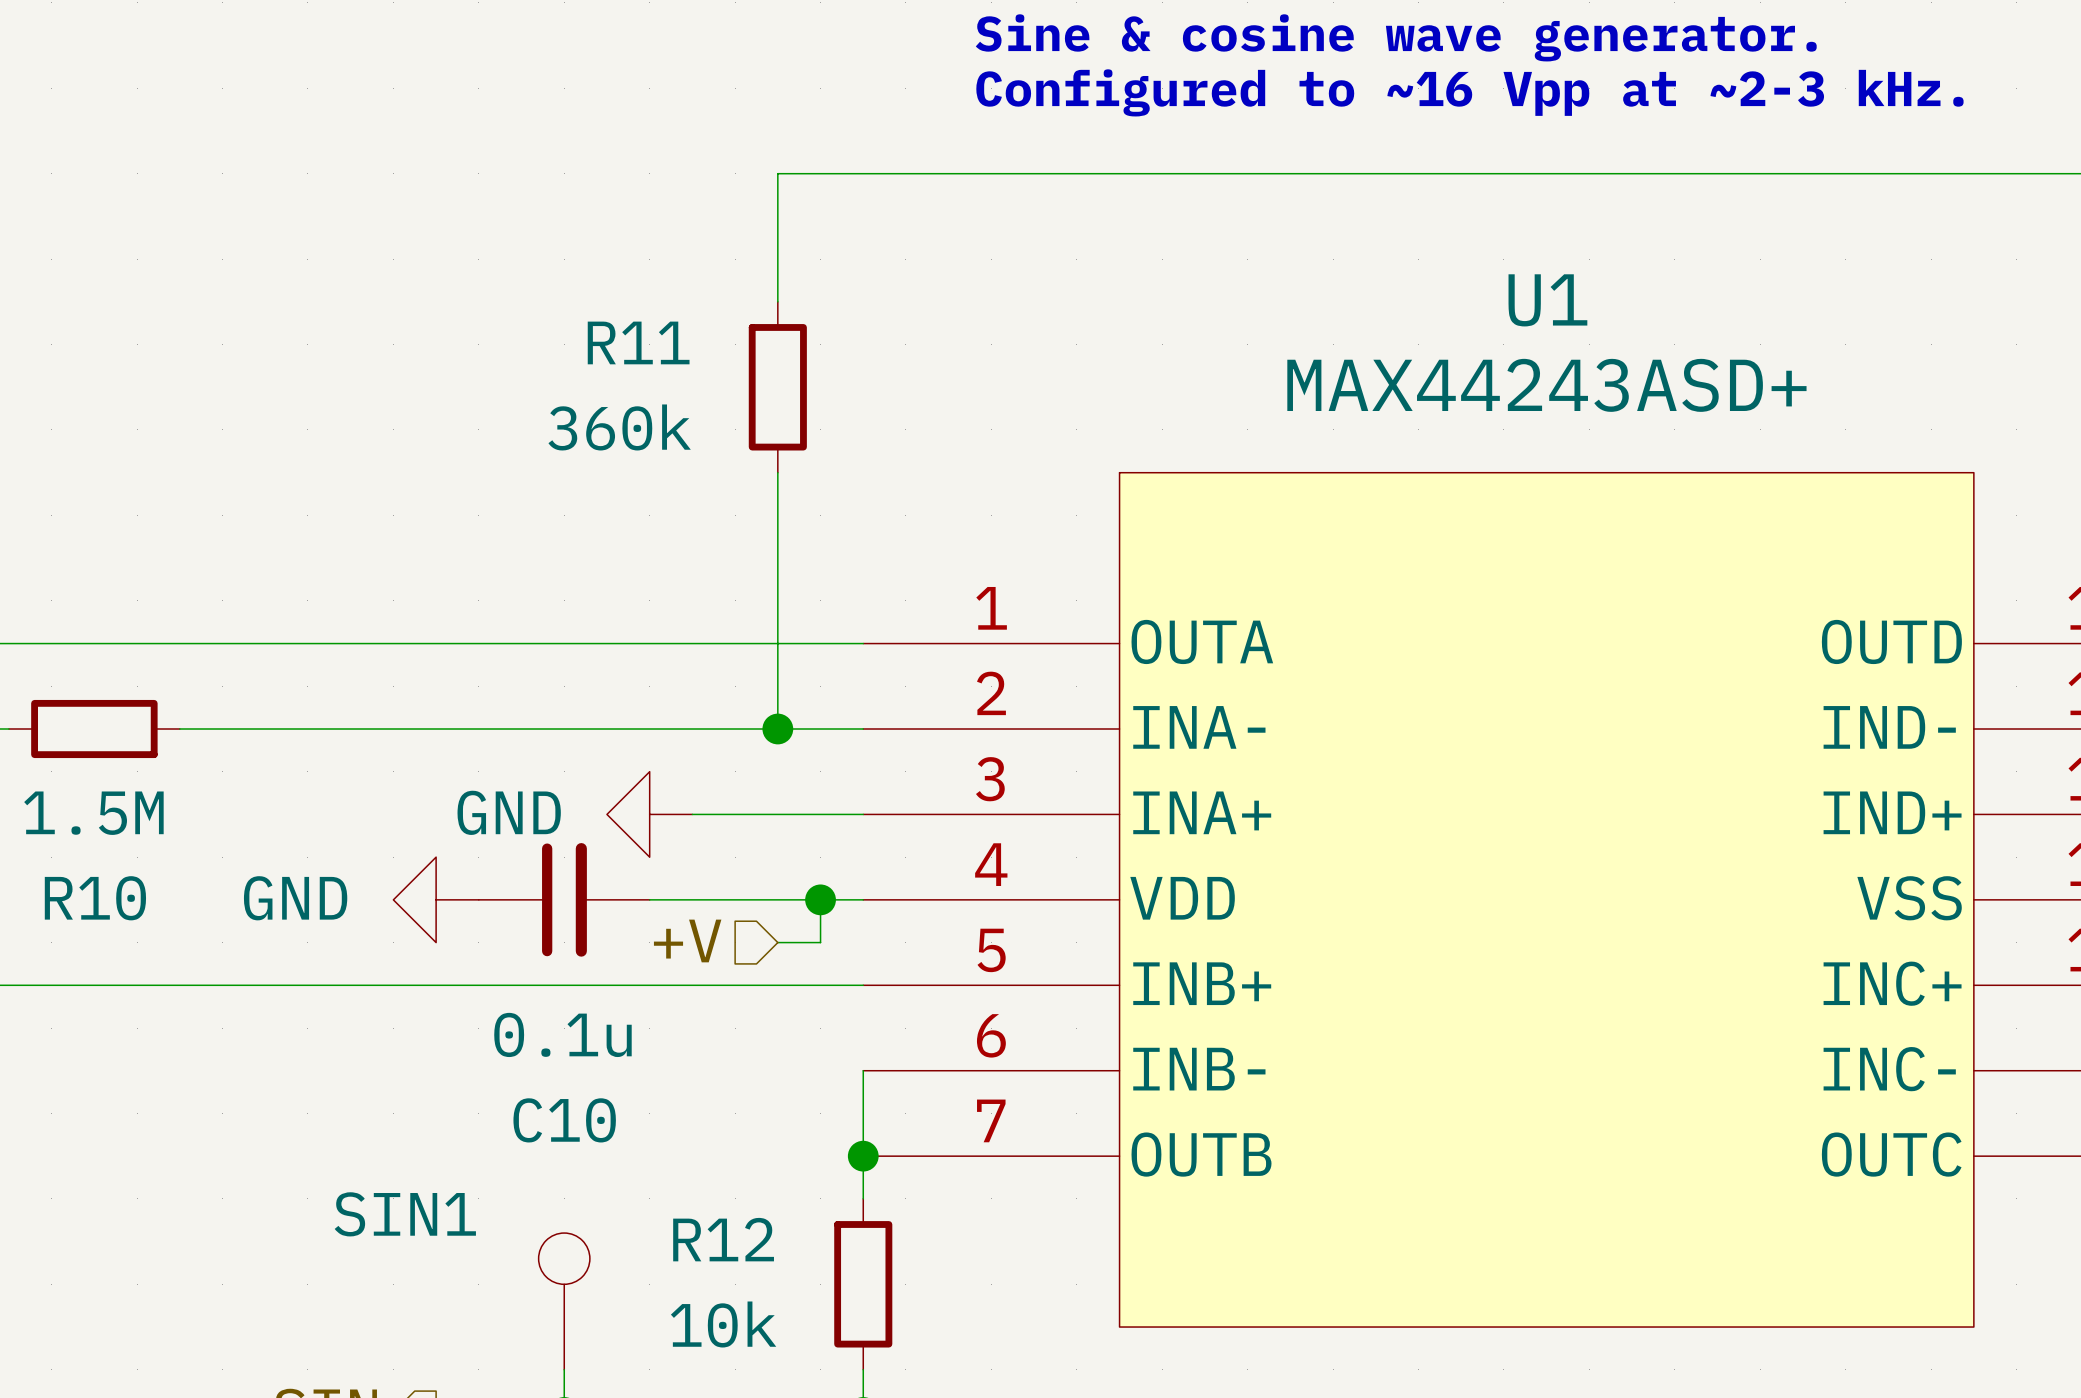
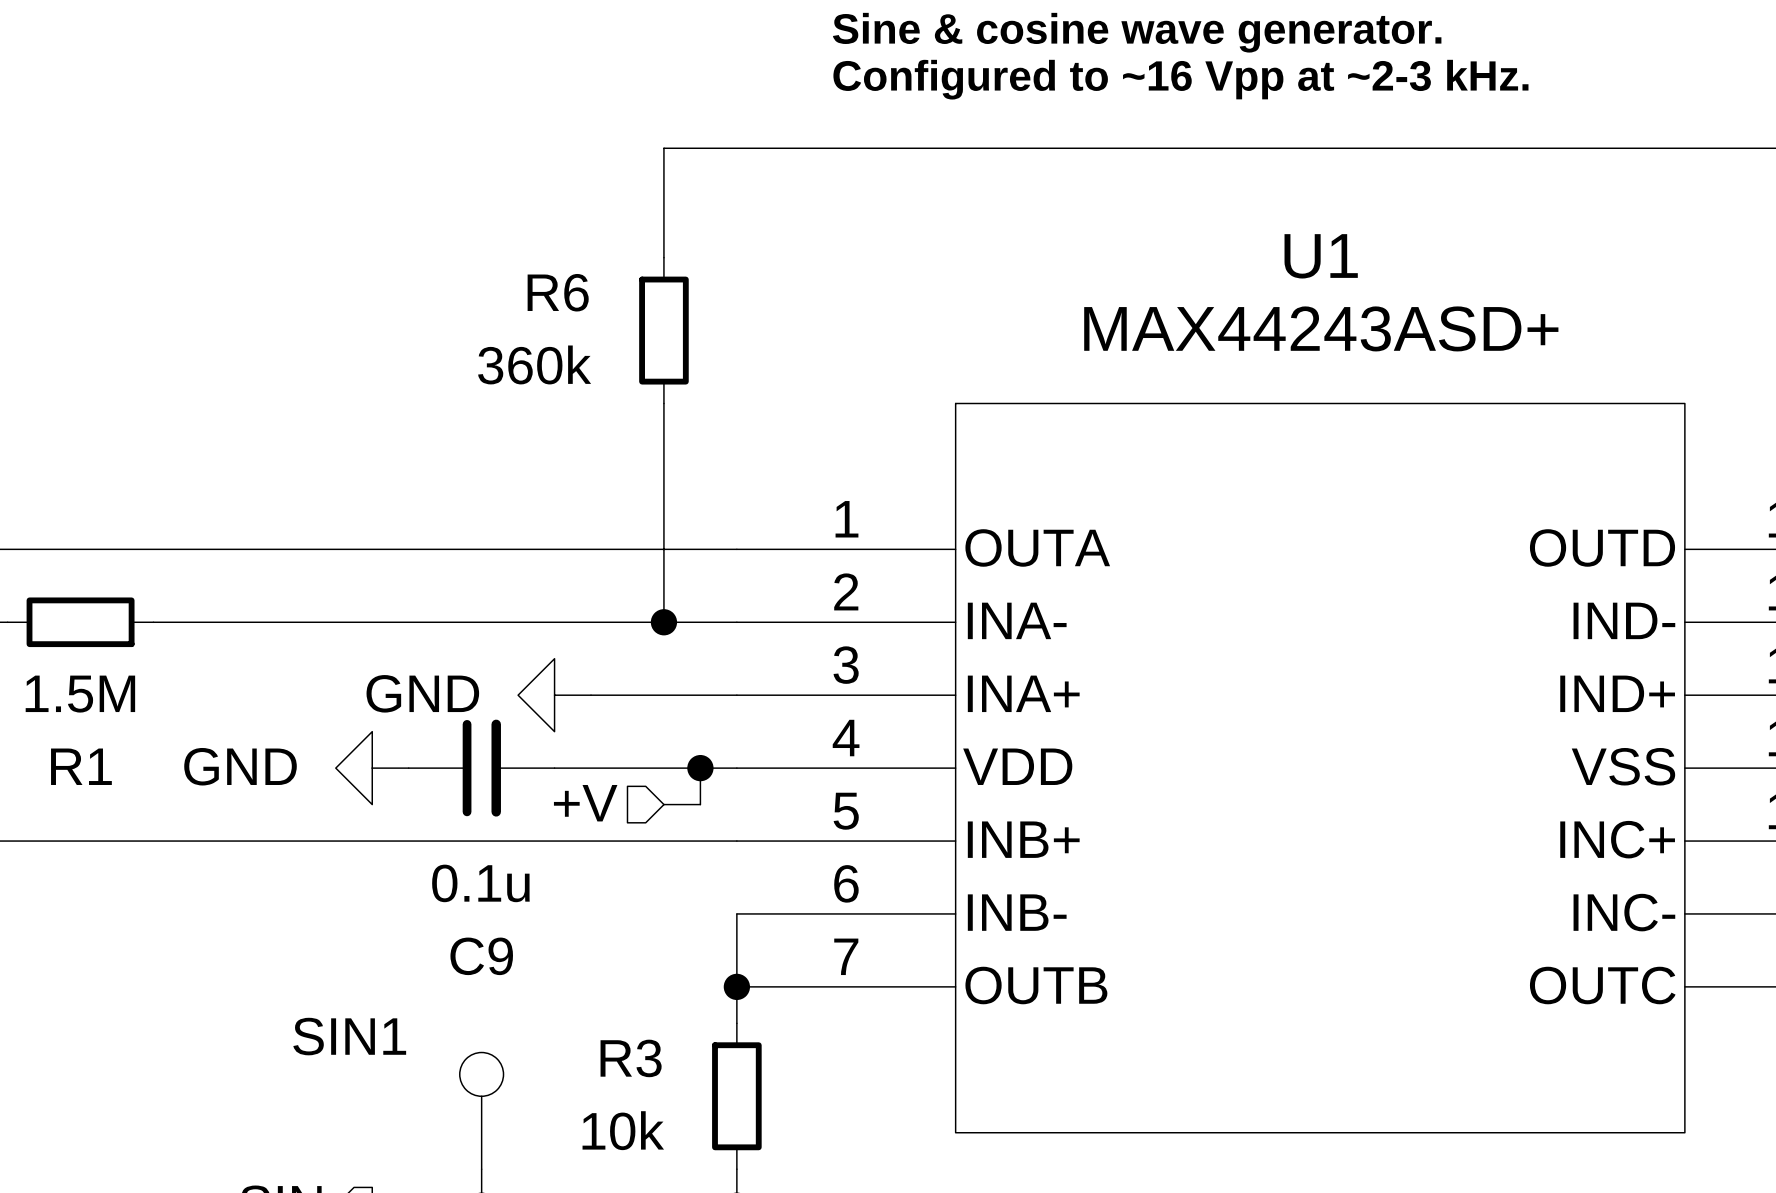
R11 name: R11 (638, 342) -> R6 (558, 292)
R10 name: R10 (95, 898) -> R1 (81, 766)
C10 name: C10 (564, 1120) -> C9 (481, 956)
R12 name: R12 (723, 1239) -> R3 (631, 1058)

